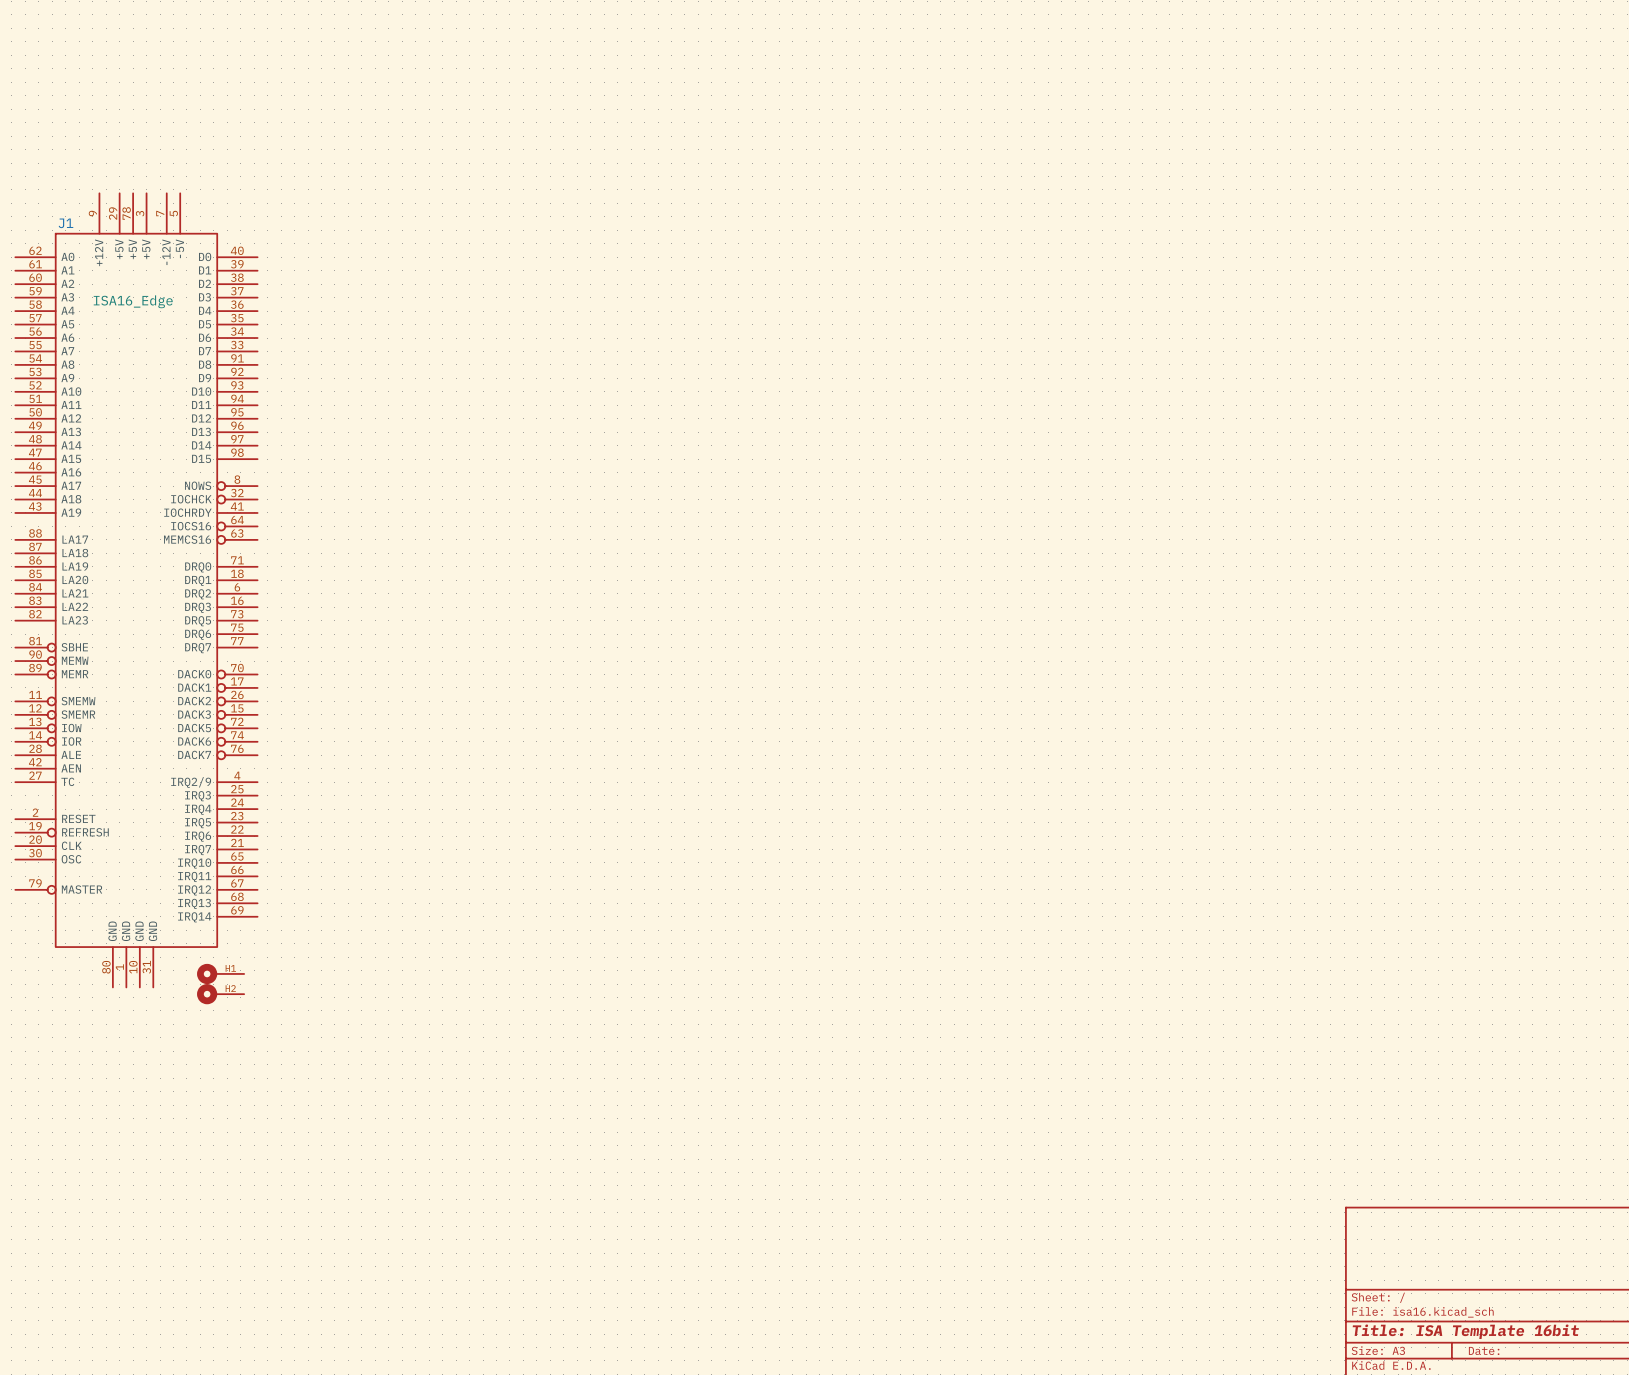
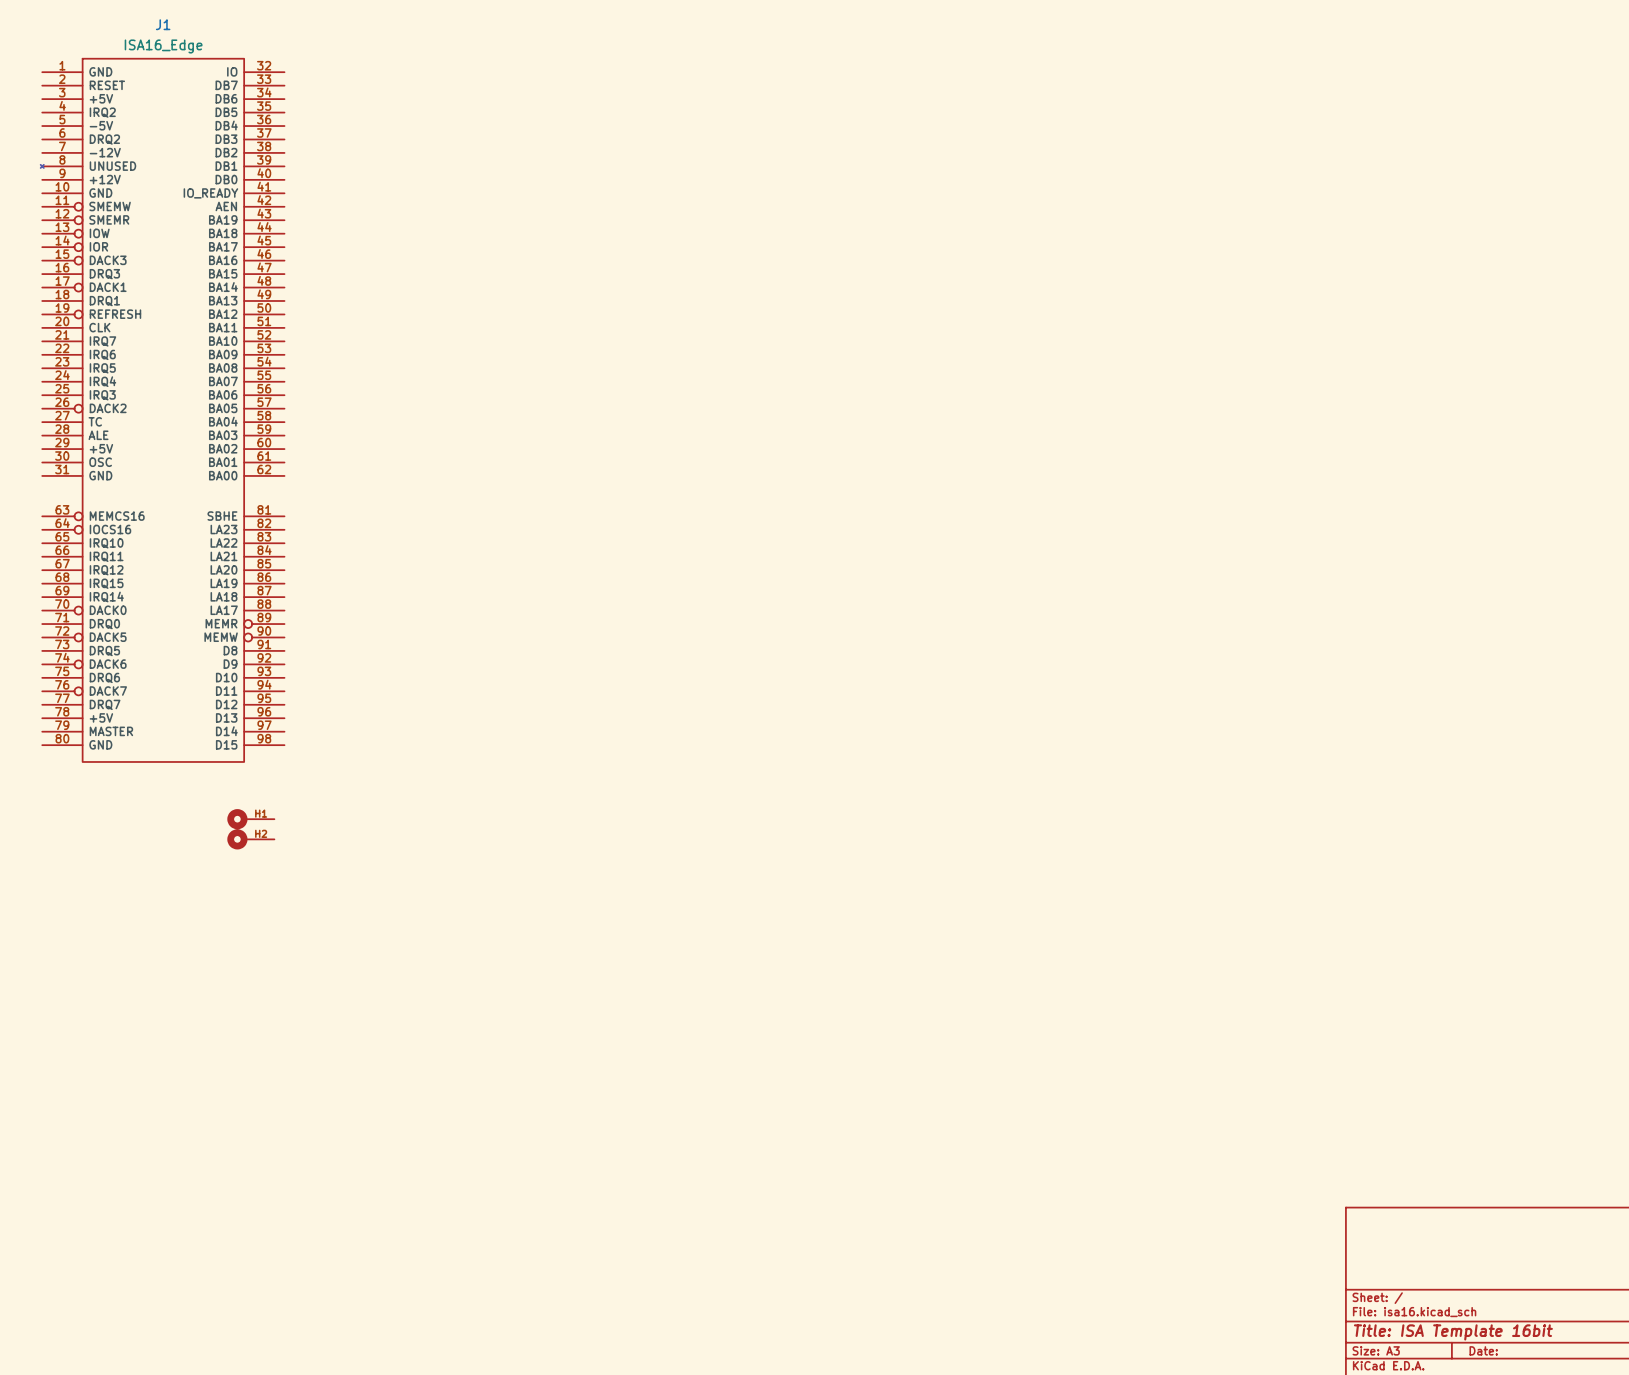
J1 symbol: [15, 193, 258, 1005] -> [40, 58, 285, 850]
J1 name position: J1 (65, 223) -> J1 (163, 24)
J1 value position: ISA16_Edge (133, 301) -> ISA16_Edge (163, 46)

